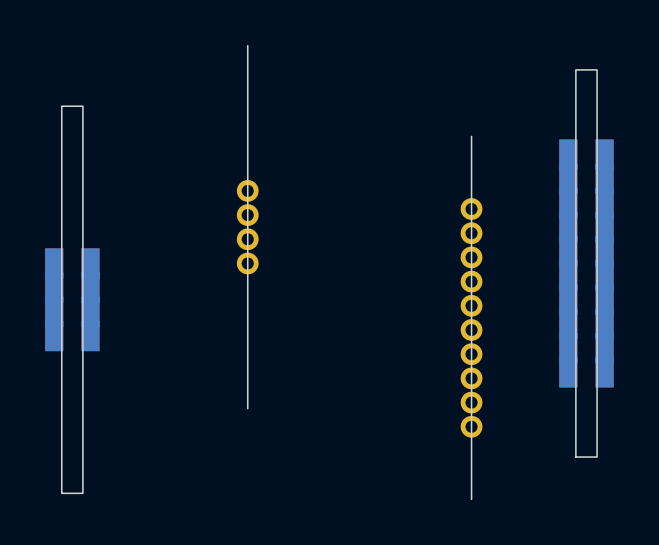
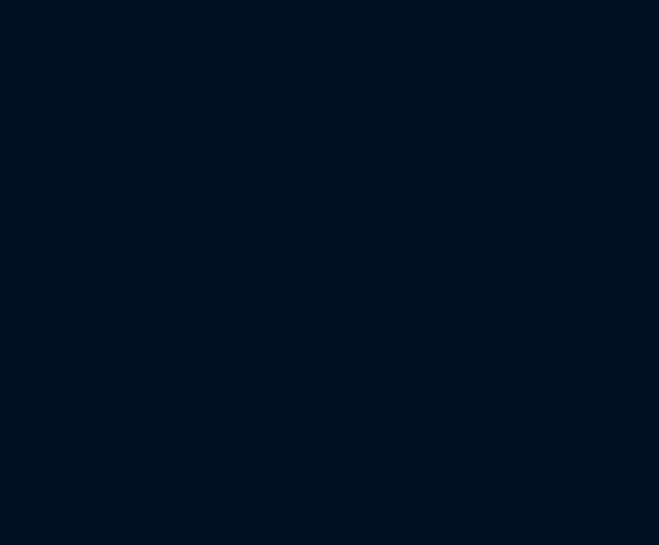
part: (247, 227) -> none
part: (586, 263) -> none
part: (72, 299) -> none
part: (471, 317) -> none

